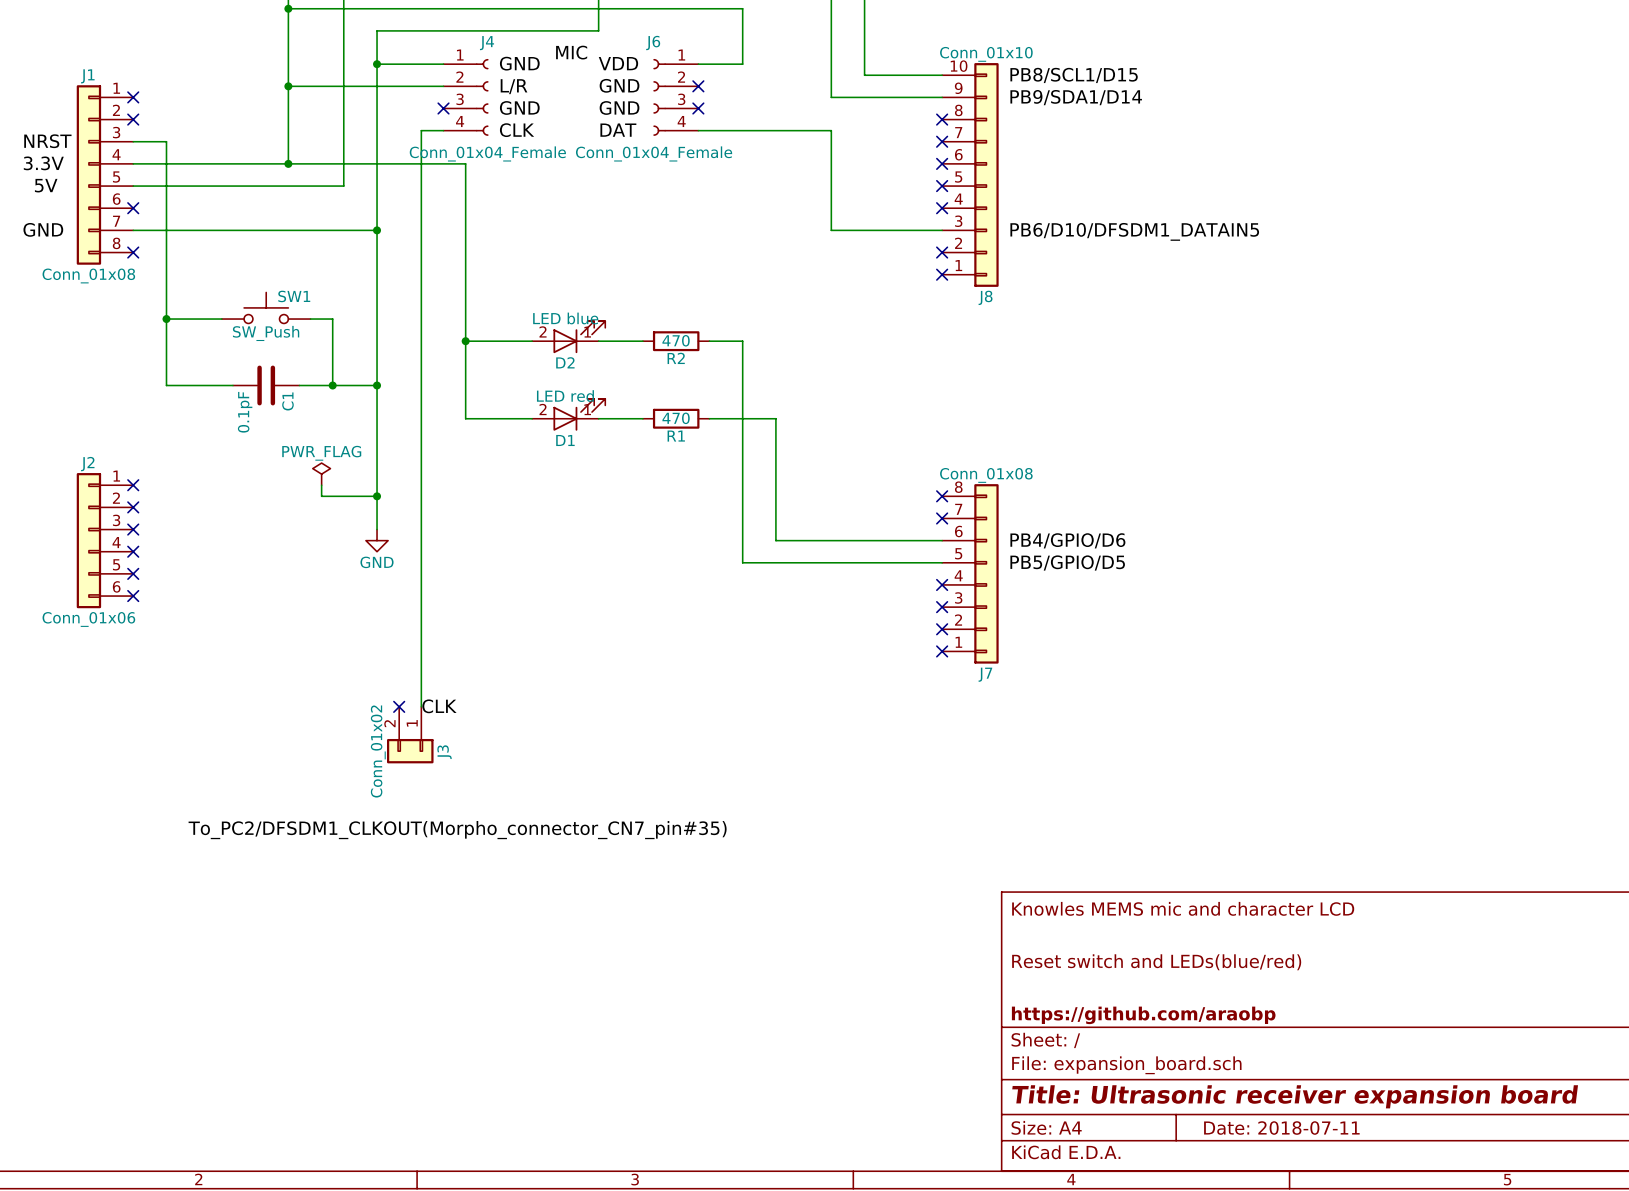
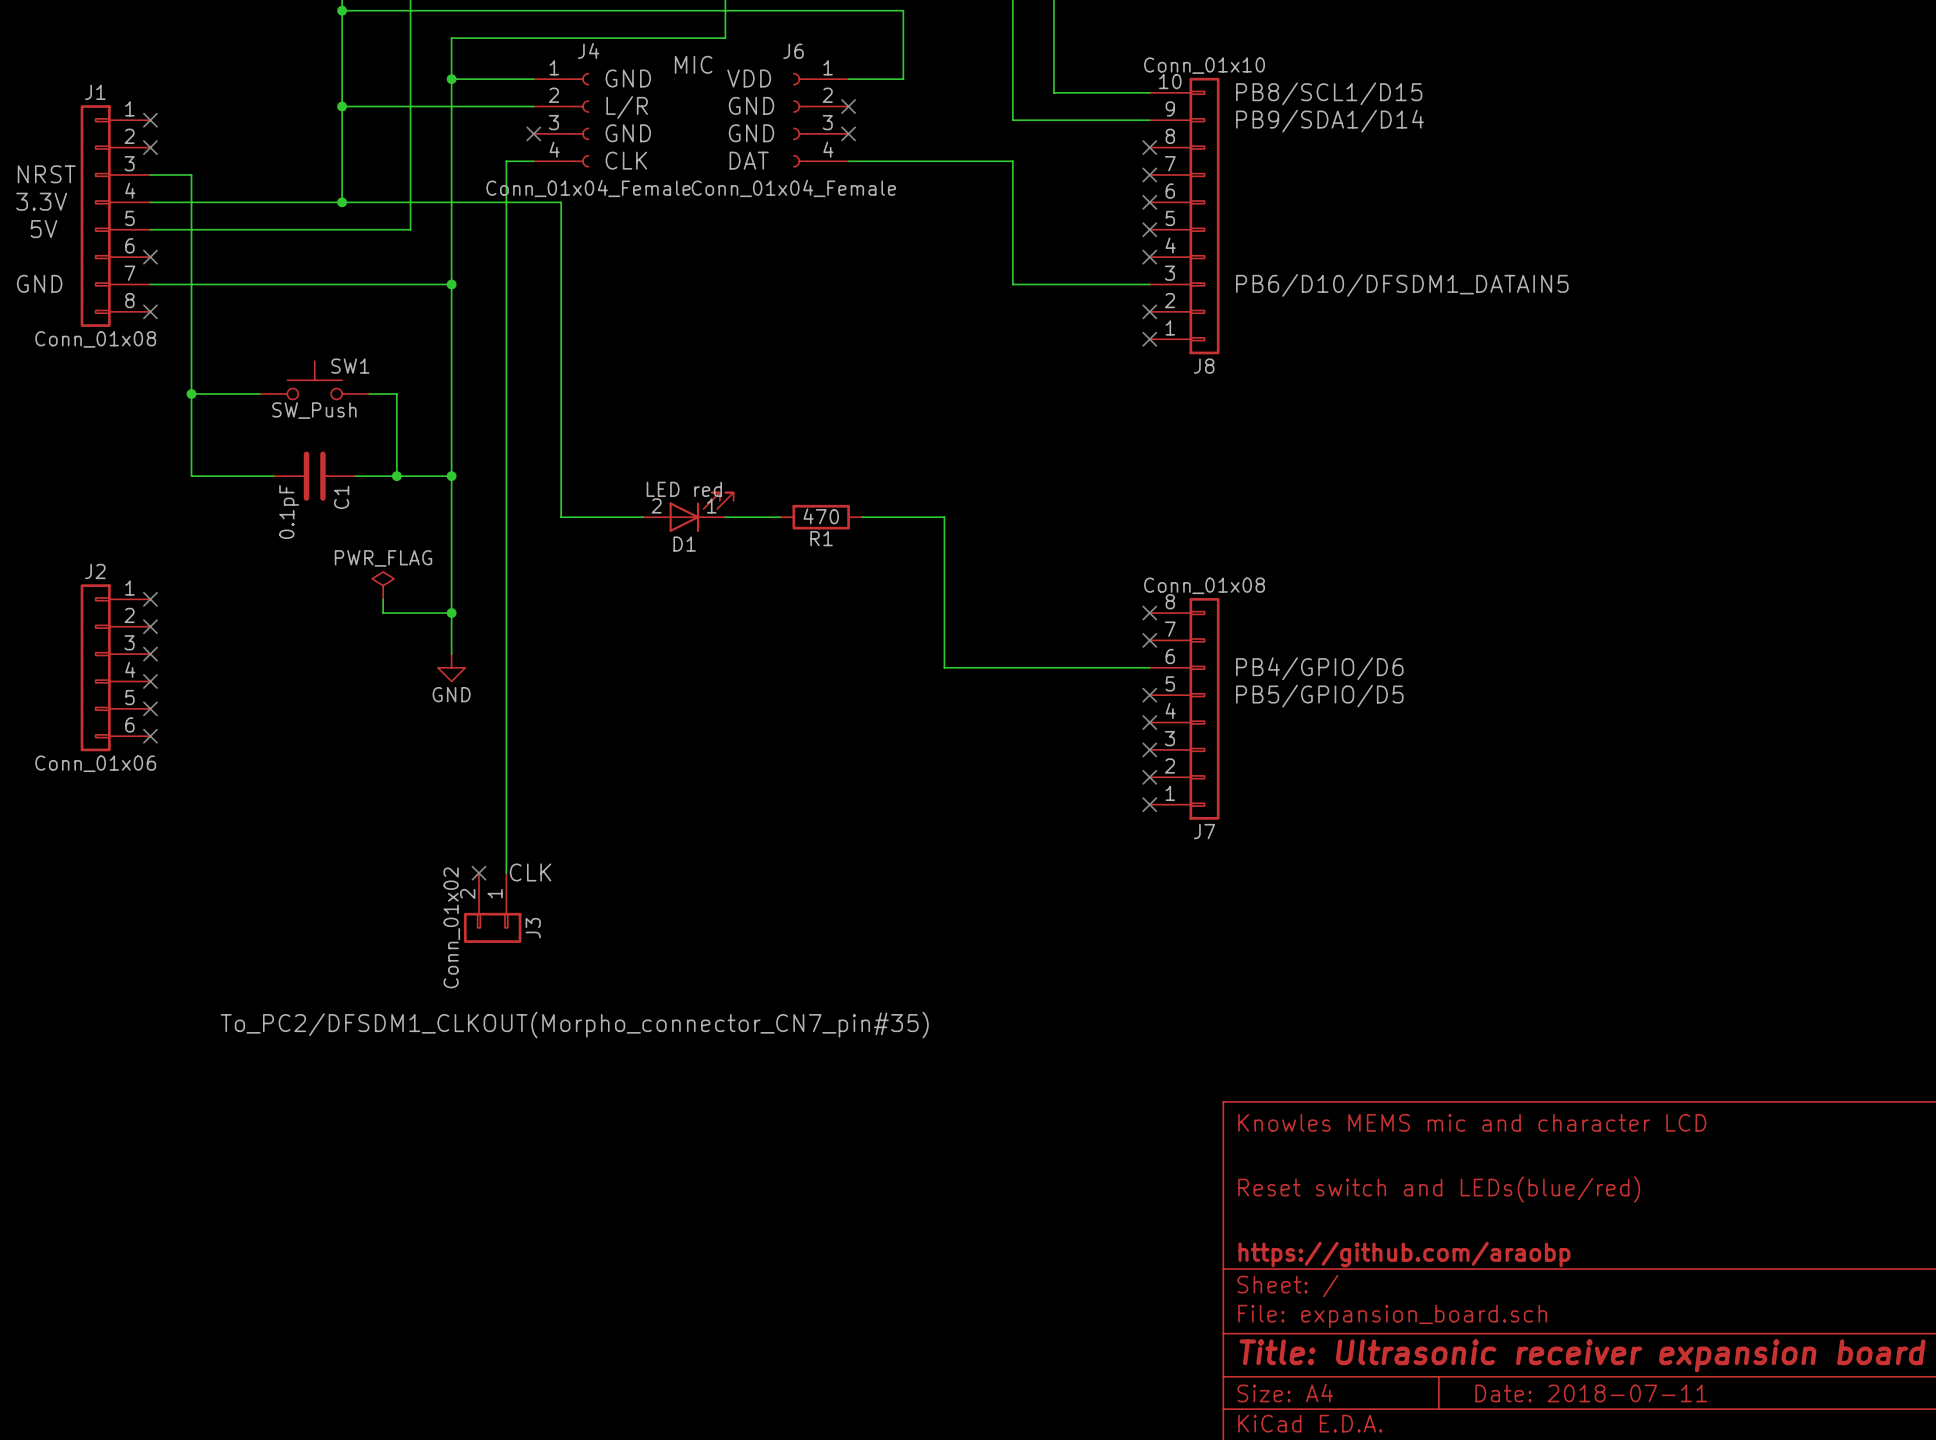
D2: LED blue (568, 337) -> none
wire: (465, 341) (532, 341) -> none
junction: (465, 341) -> none
wire: (598, 341) (642, 341) -> none
R2: 470 (676, 341) -> none
wire: (709, 341) (742, 341) (742, 562) (942, 562) -> none
no-connect mark: none -> (1149, 695)

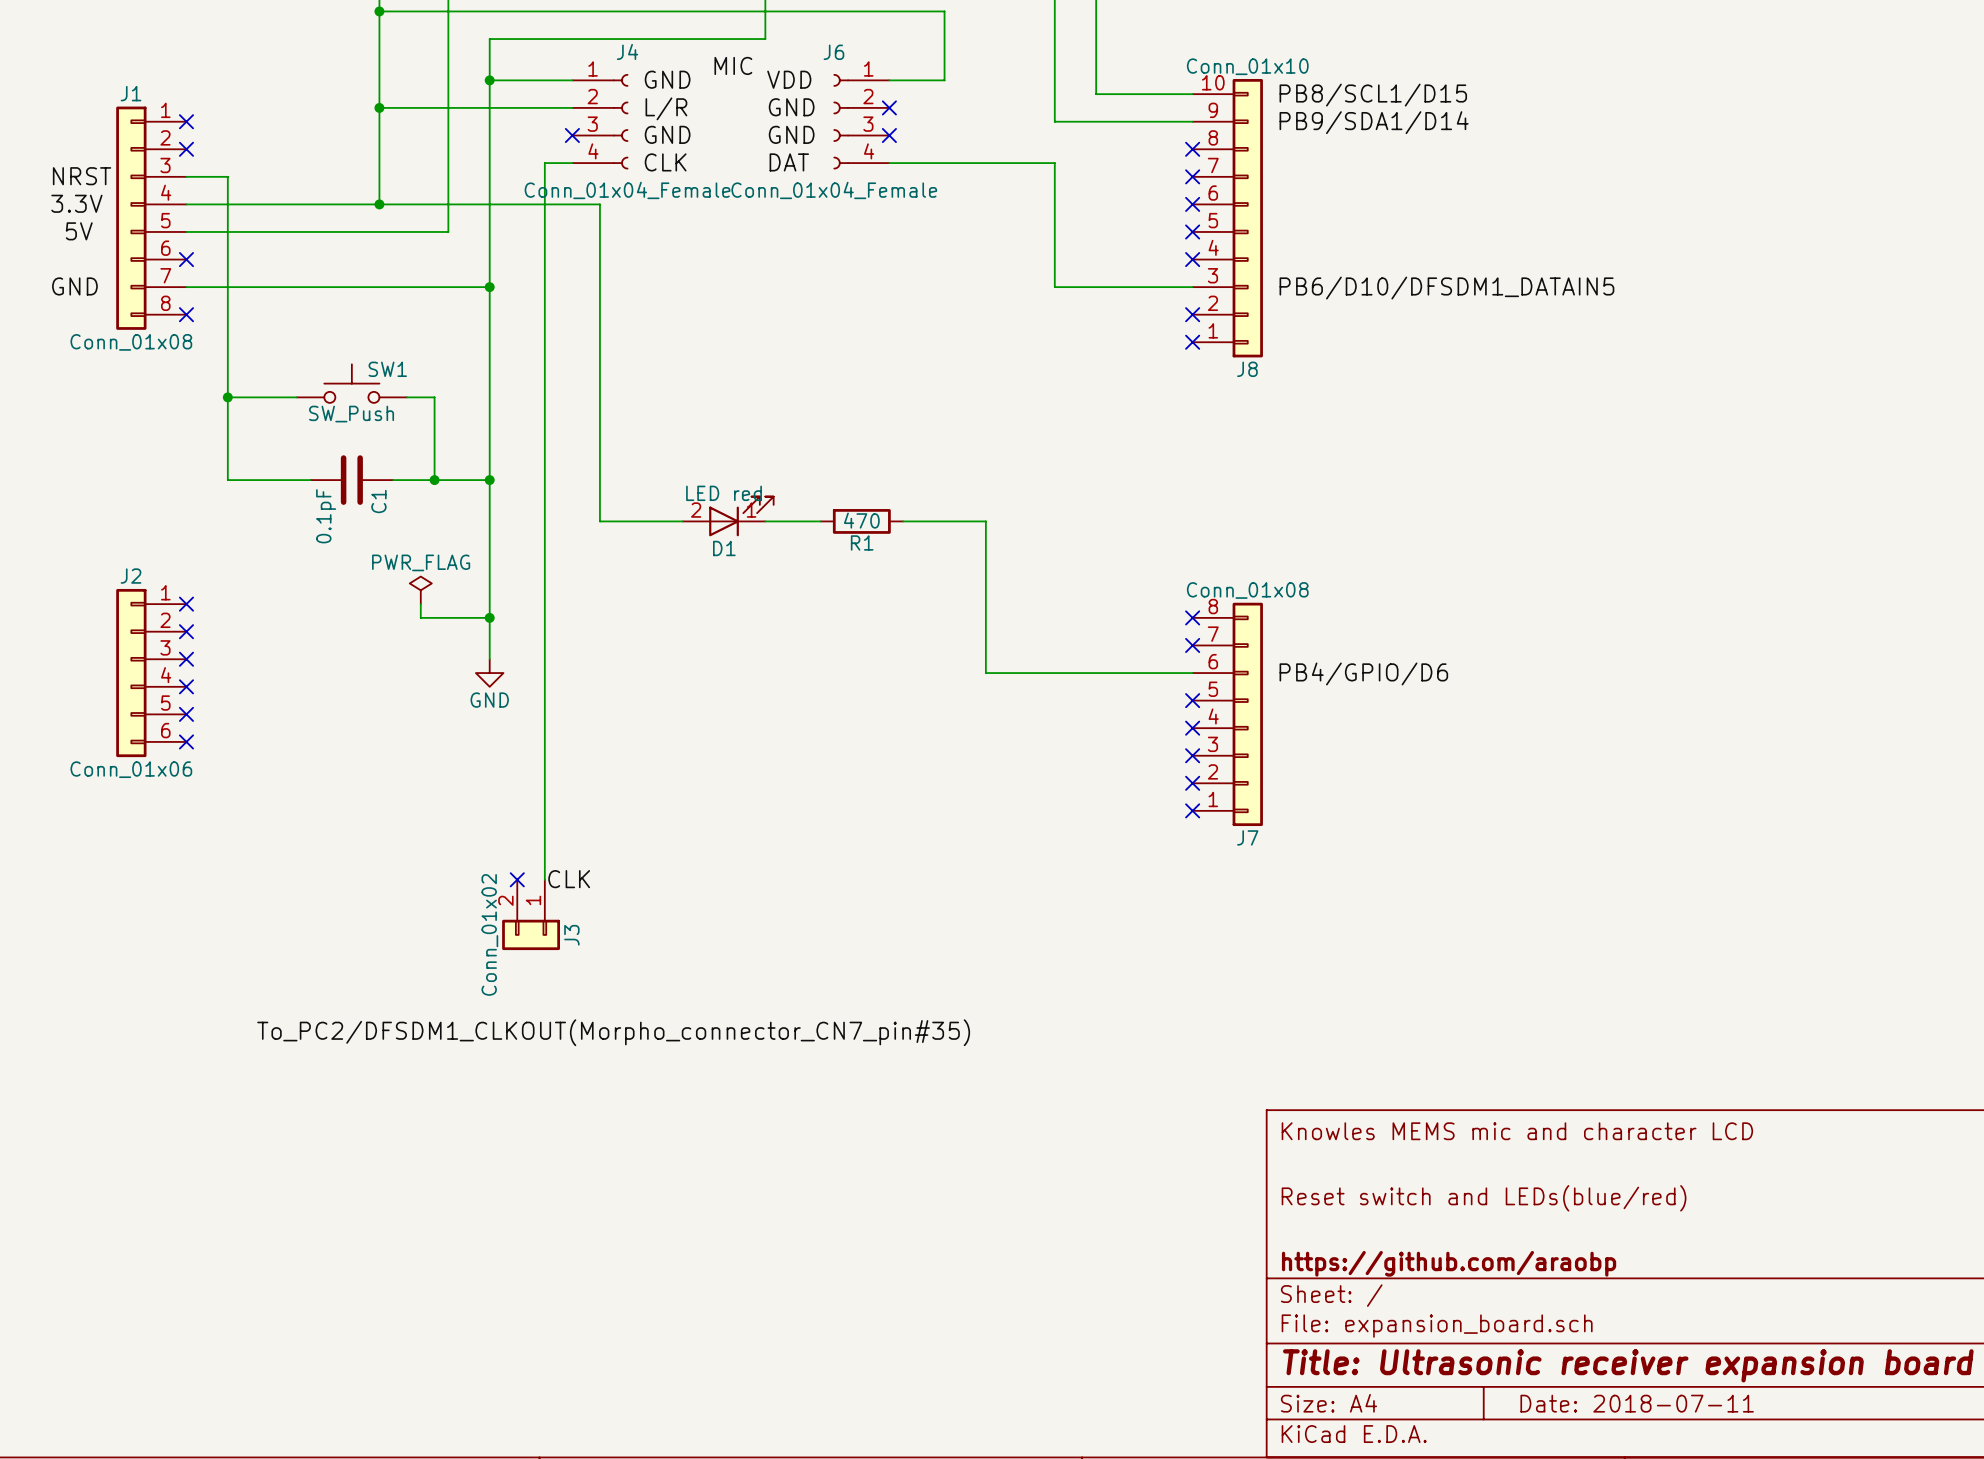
label: PB5/GPIO/D5 (1319, 696) -> none

